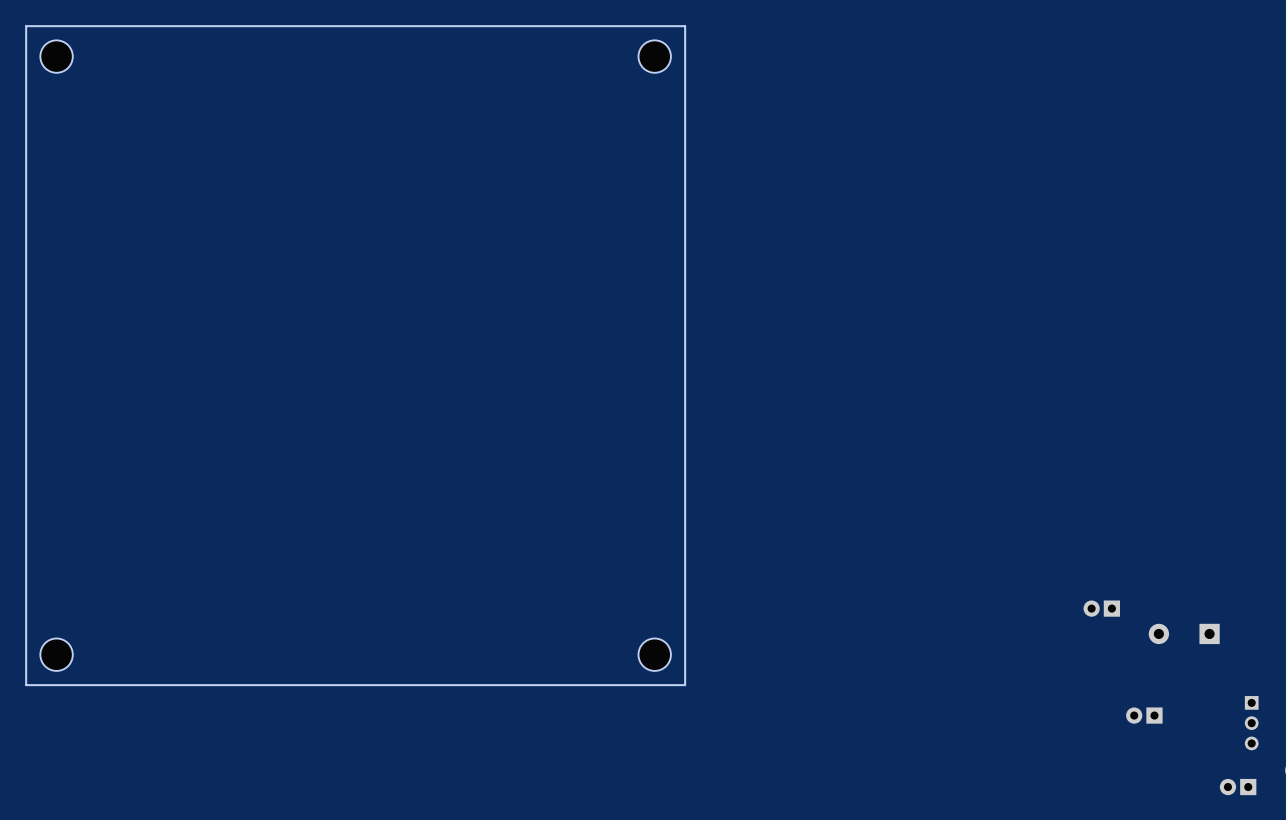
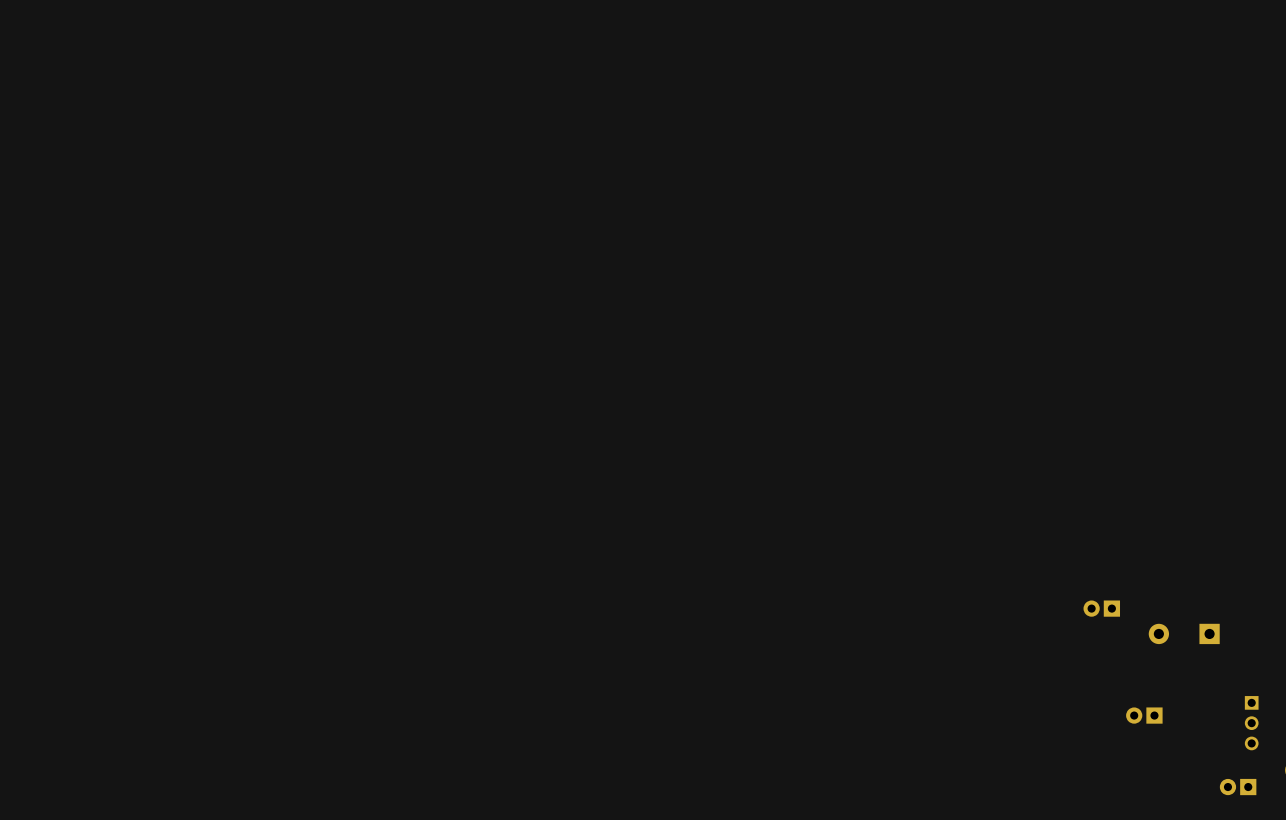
board edge: (685, 26) (26, 26) (26, 685) (685, 685) (685, 26) -> none
part: (56, 56) -> none
part: (654, 56) -> none
part: (56, 654) -> none
part: (654, 654) -> none

